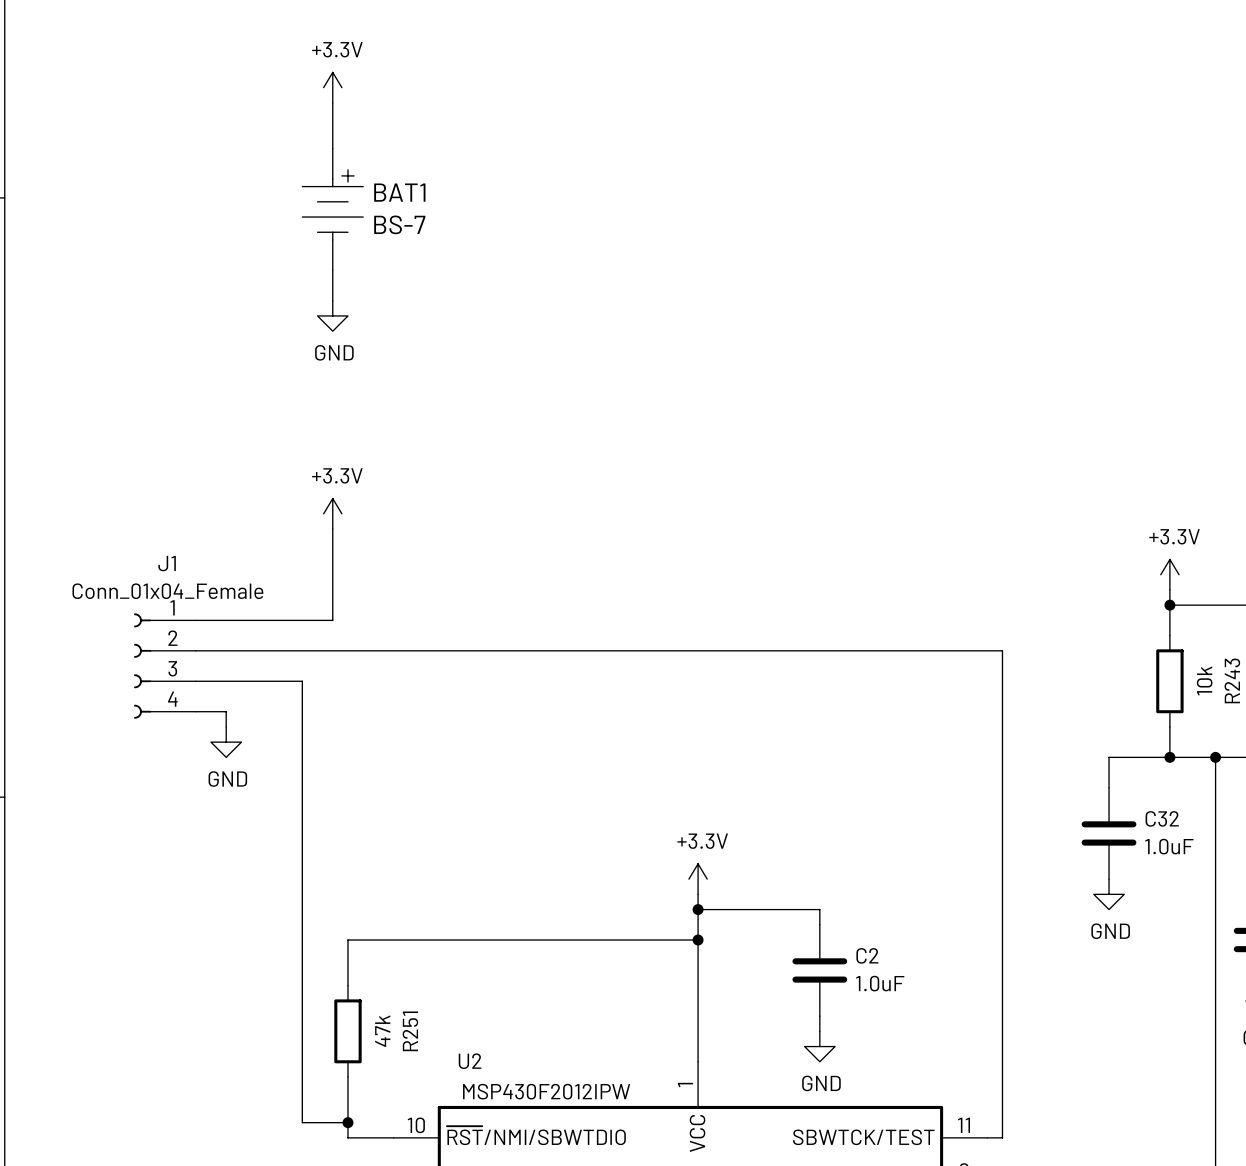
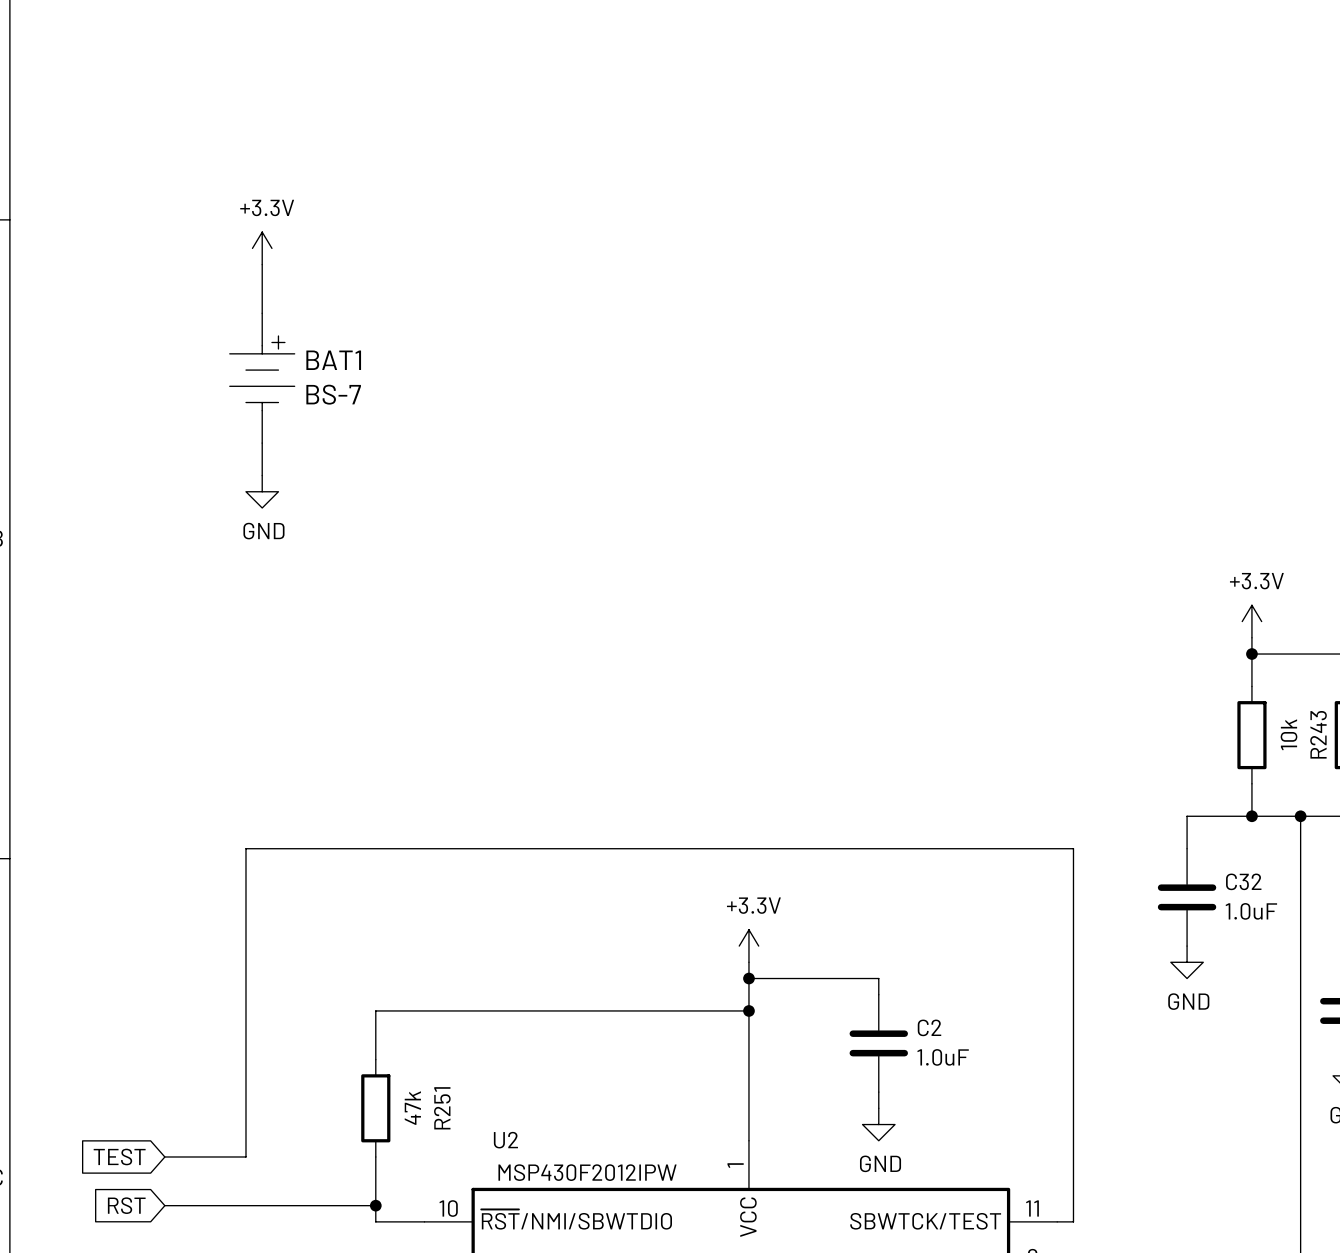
power symbol: +3.3V (332, 87) -> none
wire: (332, 102) (332, 148) -> (262, 264) (262, 313)
BAT1 position: (332, 209) -> (262, 378)
power symbol: none -> +3.3V (262, 248)
wire: (332, 270) (332, 300) -> (262, 443) (262, 475)
power symbol: GND (332, 315) -> none
power symbol: none -> GND (262, 491)
power symbol: +3.3V (332, 513) -> none
wire: (332, 529) (332, 620) (195, 620) -> none
wire: (195, 650) (1002, 650) (1002, 787) -> (164, 1156) (245, 1156) (245, 848) (1073, 848)
J1: Conn_01x04_Female (164, 666) -> none
wire: (195, 681) (302, 681) (302, 1122) -> (164, 1205) (327, 1205)
wire: (195, 711) (226, 711) (226, 726) -> none
power symbol: GND (226, 742) -> none
global label: none -> TEST (119, 1156)
global label: none -> RST (126, 1205)

